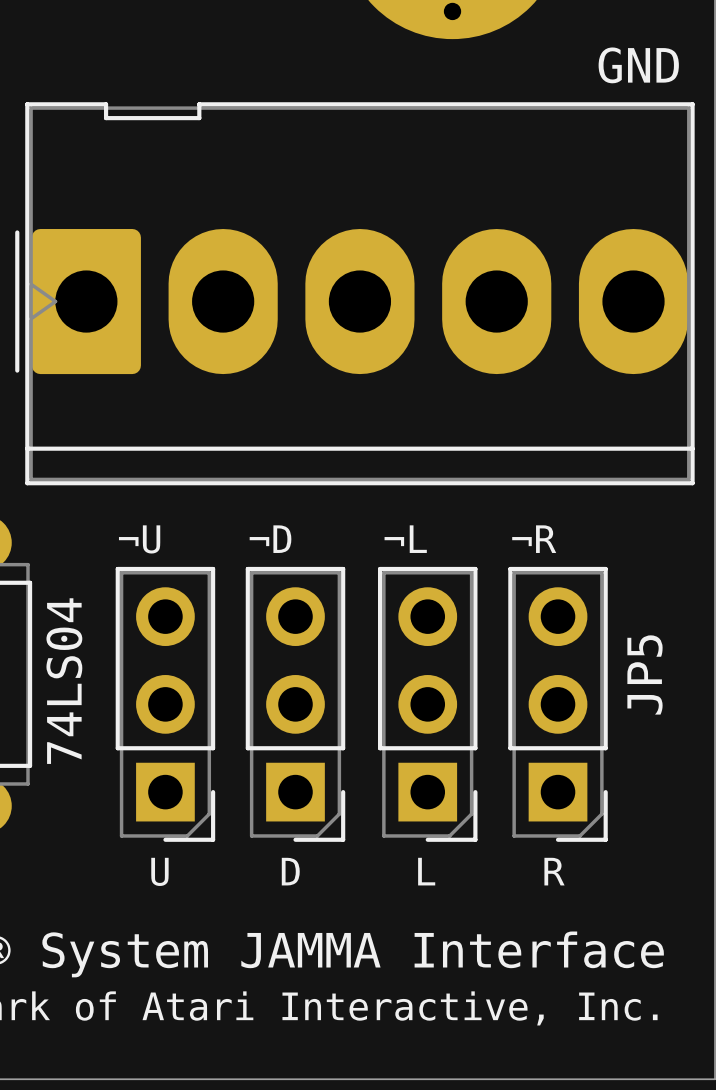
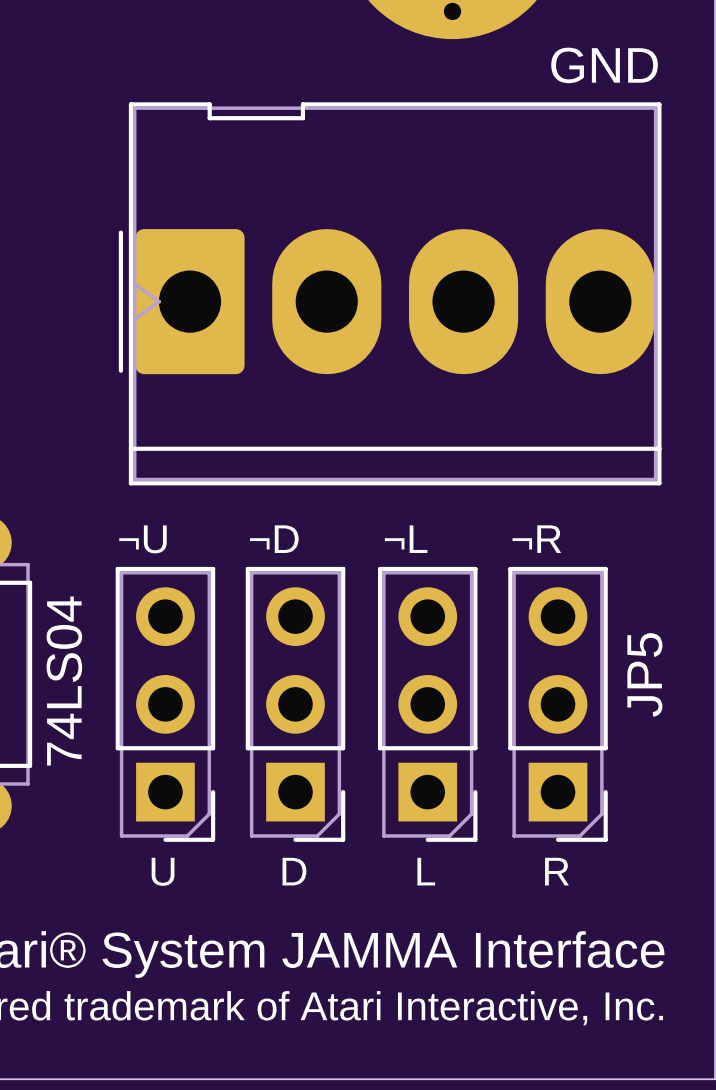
GND: (354, 293) -> none
GND: none -> (390, 293)

